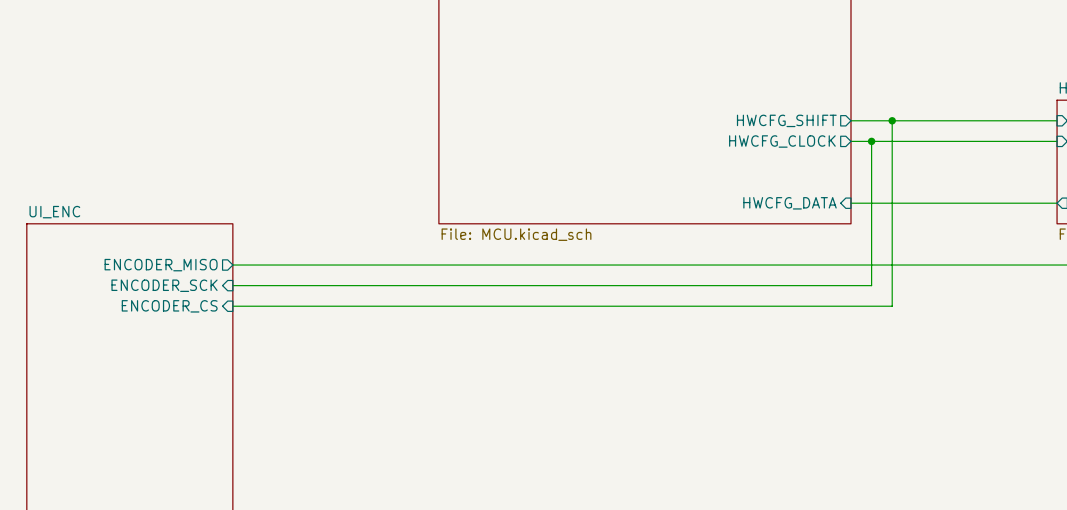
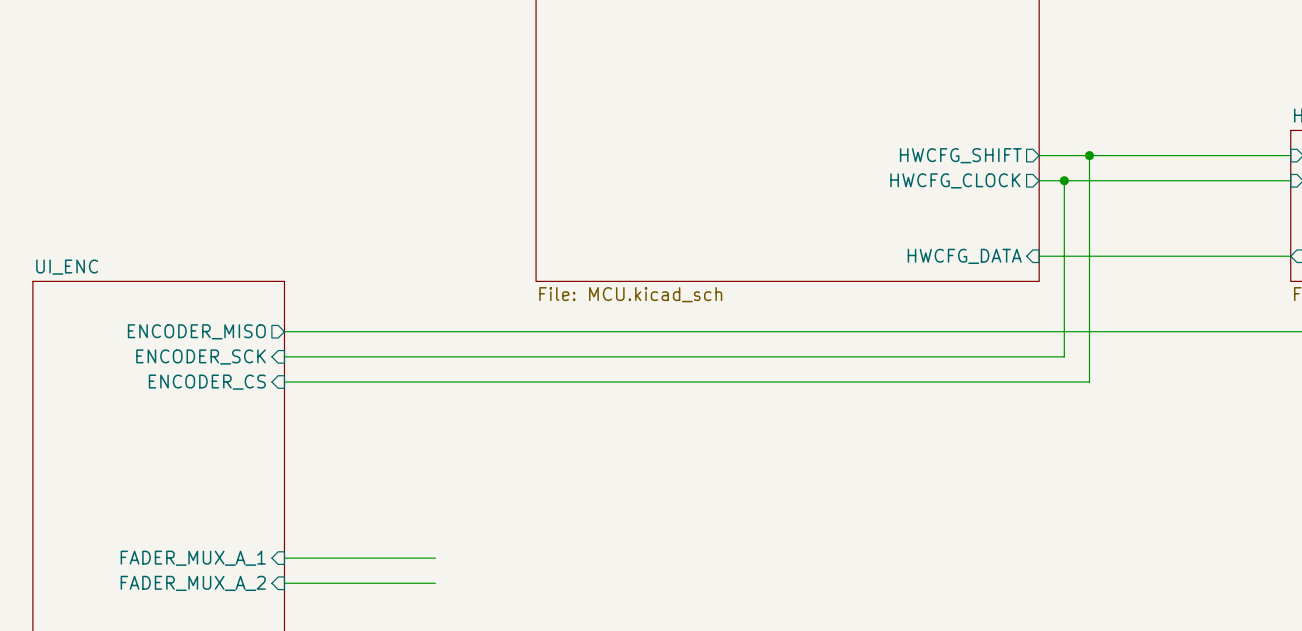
sheet pin: none -> FADER_MUX_A_1 (193, 558)
wire: none -> (284, 558) (435, 558)
sheet pin: none -> FADER_MUX_A_2 (193, 583)
wire: none -> (284, 583) (435, 583)

